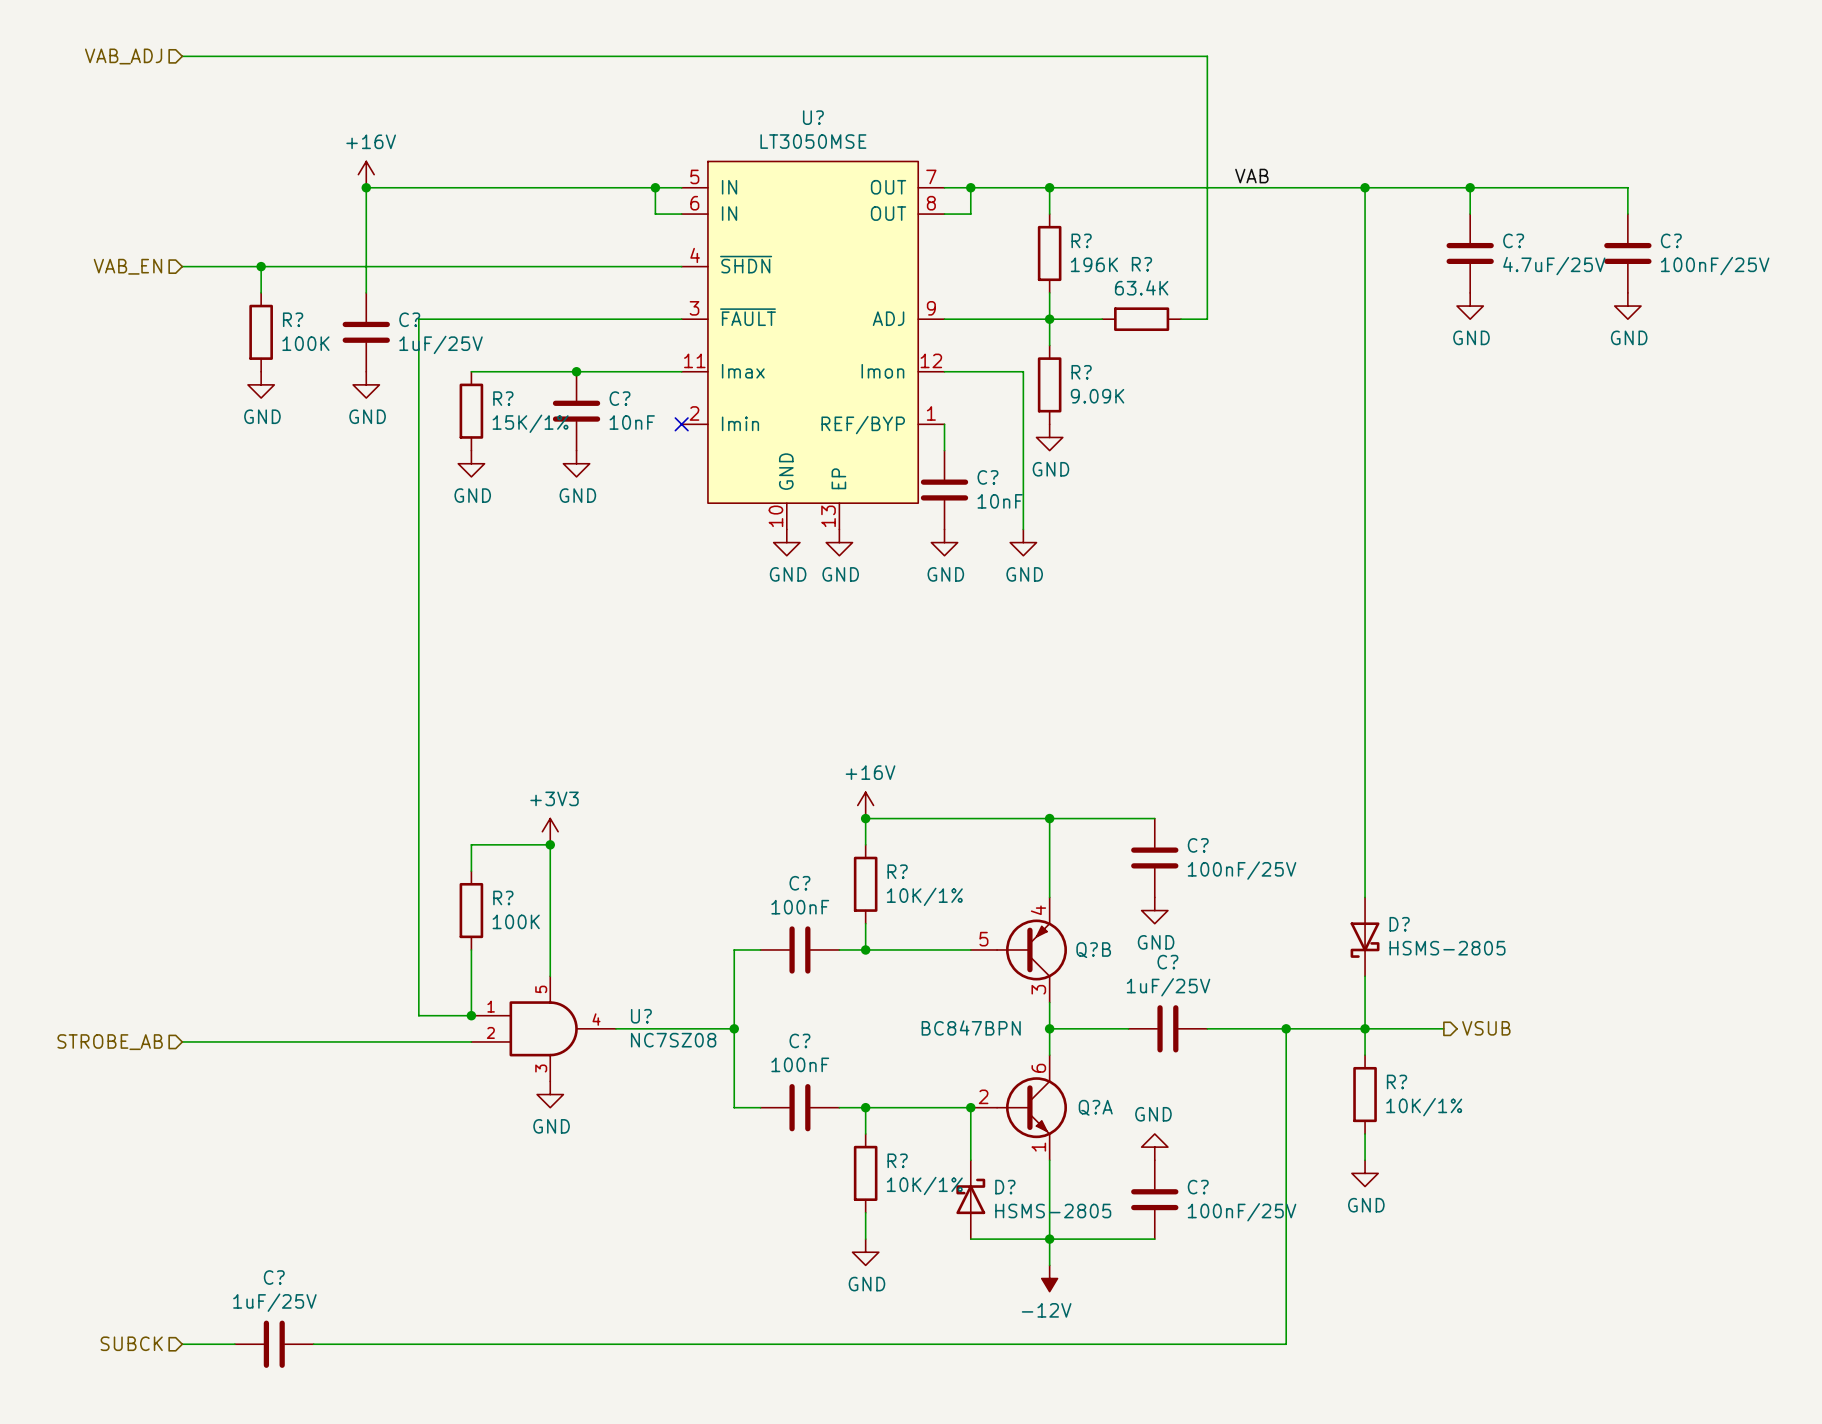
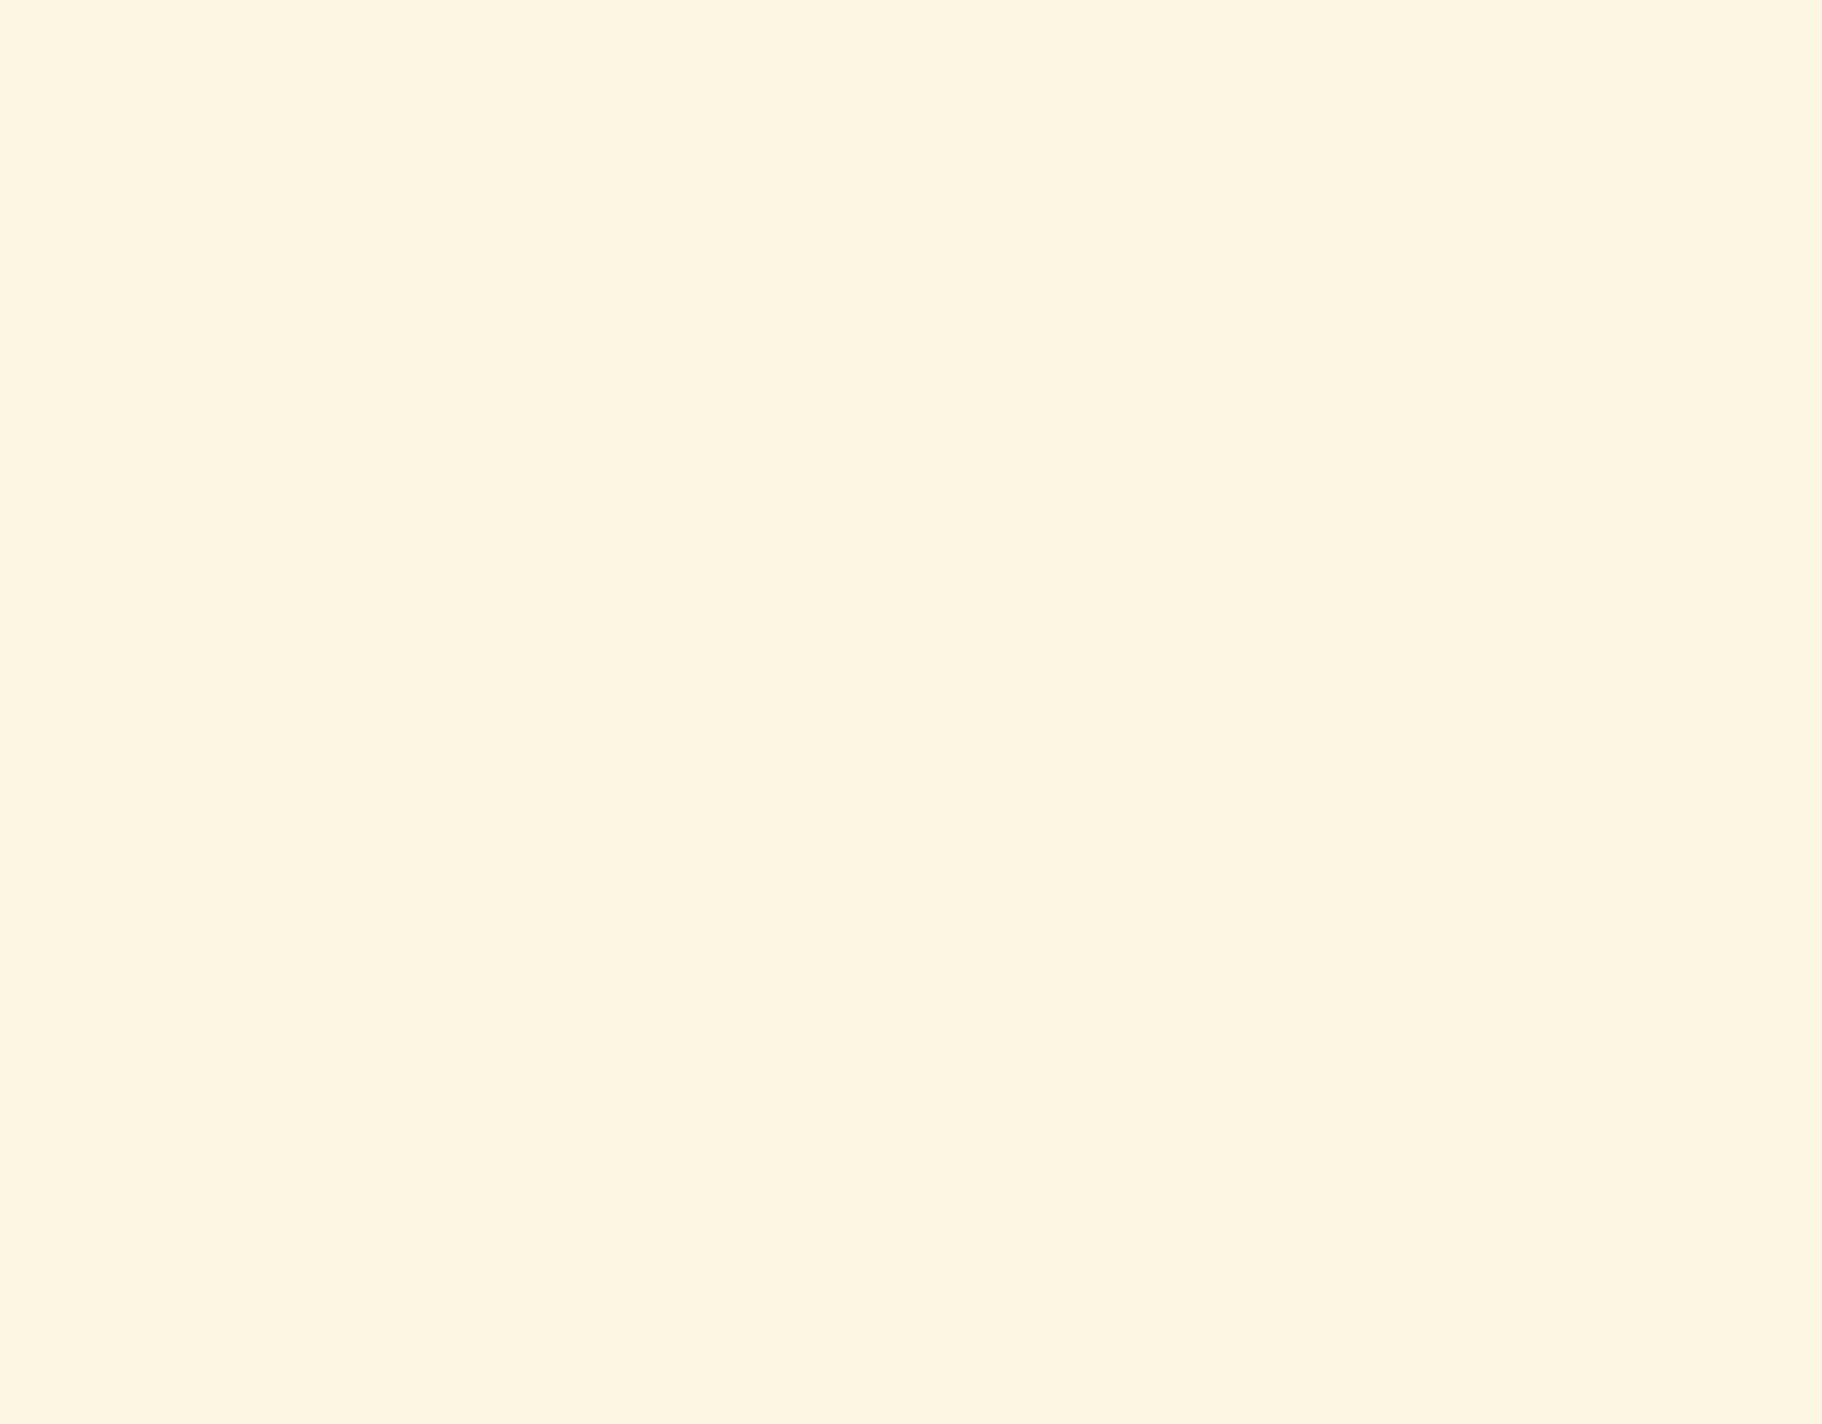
hierarchical label: VAB_ADJ (123, 56) -> none
wire: (182, 56) (1207, 56) (1207, 319) (1181, 319) -> none
power symbol: +16V (366, 174) -> none
label: VAB (1251, 176) -> none
junction: (366, 187) -> none
wire: (655, 187) (655, 214) (681, 214) -> none
junction: (655, 187) -> none
wire: (681, 187) (366, 187) (366, 292) -> none
wire: (944, 187) (1627, 187) (1627, 214) -> none
wire: (970, 187) (970, 214) (944, 214) -> none
junction: (970, 187) -> none
wire: (1049, 187) (1049, 214) -> none
junction: (1049, 187) -> none
wire: (1365, 187) (1365, 897) -> none
junction: (1365, 187) -> none
wire: (1470, 187) (1470, 214) -> none
junction: (1470, 187) -> none
R?: 196K (1049, 253) -> none
C?: 4.7uF/25V (1470, 253) -> none
C?: 100nF/25V (1627, 253) -> none
hierarchical label: VAB_EN (127, 266) -> none
wire: (182, 266) (681, 266) -> none
wire: (261, 266) (261, 292) -> none
junction: (261, 266) -> none
wire: (1049, 292) (1049, 345) -> none
power symbol: GND (1470, 306) -> none
power symbol: GND (1627, 306) -> none
wire: (681, 319) (418, 319) (418, 1015) (471, 1015) (471, 949) -> none
wire: (944, 319) (1102, 319) -> none
junction: (1049, 319) -> none
R?: 63.4K (1141, 319) -> none
R?: 100K (261, 332) -> none
C?: 1uF/25V (366, 332) -> none
U?: LT3050MSE (813, 345) -> none
wire: (471, 371) (681, 371) -> none
junction: (576, 371) -> none
wire: (944, 371) (1023, 371) (1023, 529) -> none
power symbol: GND (261, 384) -> none
power symbol: GND (366, 384) -> none
R?: 9.09K (1049, 384) -> none
R?: 15K/1% (471, 411) -> none
C?: 10nF (576, 411) -> none
no-connect mark: (681, 424) -> none
wire: (944, 424) (944, 450) -> none
power symbol: GND (1049, 437) -> none
power symbol: GND (471, 463) -> none
power symbol: GND (576, 463) -> none
C?: 10nF (944, 490) -> none
power symbol: GND (786, 542) -> none
power symbol: GND (839, 542) -> none
power symbol: GND (944, 542) -> none
power symbol: GND (1023, 542) -> none
power symbol: +16V (865, 805) -> none
junction: (865, 818) -> none
wire: (1049, 818) (1049, 897) -> none
junction: (1049, 818) -> none
wire: (1154, 818) (865, 818) (865, 844) -> none
power symbol: +3V3 (550, 831) -> none
junction: (550, 844) -> none
C?: 100nF/25V (1154, 857) -> none
wire: (471, 871) (471, 844) (550, 844) (550, 976) -> none
R?: 10K/1% (865, 884) -> none
R?: 100K (471, 910) -> none
power symbol: GND (1154, 910) -> none
wire: (865, 923) (865, 949) -> none
D?: HSMS-2805 (1365, 936) -> none
wire: (760, 949) (734, 949) (734, 1107) (760, 1107) -> none
C?: 100nF (799, 949) -> none
wire: (839, 949) (970, 949) -> none
junction: (865, 949) -> none
Q?B: (1018, 949) -> none
wire: (1365, 976) (1365, 1055) -> none
wire: (1049, 1002) (1049, 1055) -> none
junction: (471, 1015) -> none
U?: NC7SZ08 (543, 1028) -> none
wire: (615, 1028) (734, 1028) -> none
junction: (734, 1028) -> none
wire: (1049, 1028) (1128, 1028) -> none
junction: (1049, 1028) -> none
C?: 1uF/25V (1167, 1028) -> none
wire: (1207, 1028) (1443, 1028) -> none
wire: (1286, 1028) (1286, 1344) (313, 1344) -> none
junction: (1286, 1028) -> none
junction: (1365, 1028) -> none
hierarchical label: VSUB (1486, 1028) -> none
wire: (182, 1041) (471, 1041) -> none
hierarchical label: STROBE_AB (110, 1042) -> none
power symbol: GND (550, 1094) -> none
R?: 10K/1% (1365, 1094) -> none
C?: 100nF (799, 1107) -> none
wire: (839, 1107) (970, 1107) (970, 1160) -> none
wire: (865, 1107) (865, 1133) -> none
junction: (865, 1107) -> none
junction: (970, 1107) -> none
Q?A: BC847BPN (1018, 1107) -> none
wire: (1365, 1133) (1365, 1160) -> none
power symbol: GND (1154, 1147) -> none
wire: (1049, 1160) (1049, 1265) -> none
R?: 10K/1% (865, 1173) -> none
power symbol: GND (1365, 1173) -> none
D?: HSMS-2805 (970, 1199) -> none
C?: 100nF/25V (1154, 1199) -> none
wire: (865, 1212) (865, 1239) -> none
wire: (970, 1239) (1154, 1239) -> none
junction: (1049, 1239) -> none
power symbol: GND (865, 1252) -> none
power symbol: -12V (1049, 1278) -> none
hierarchical label: SUBCK (131, 1343) -> none
wire: (182, 1344) (234, 1344) -> none
C?: 1uF/25V (274, 1344) -> none

